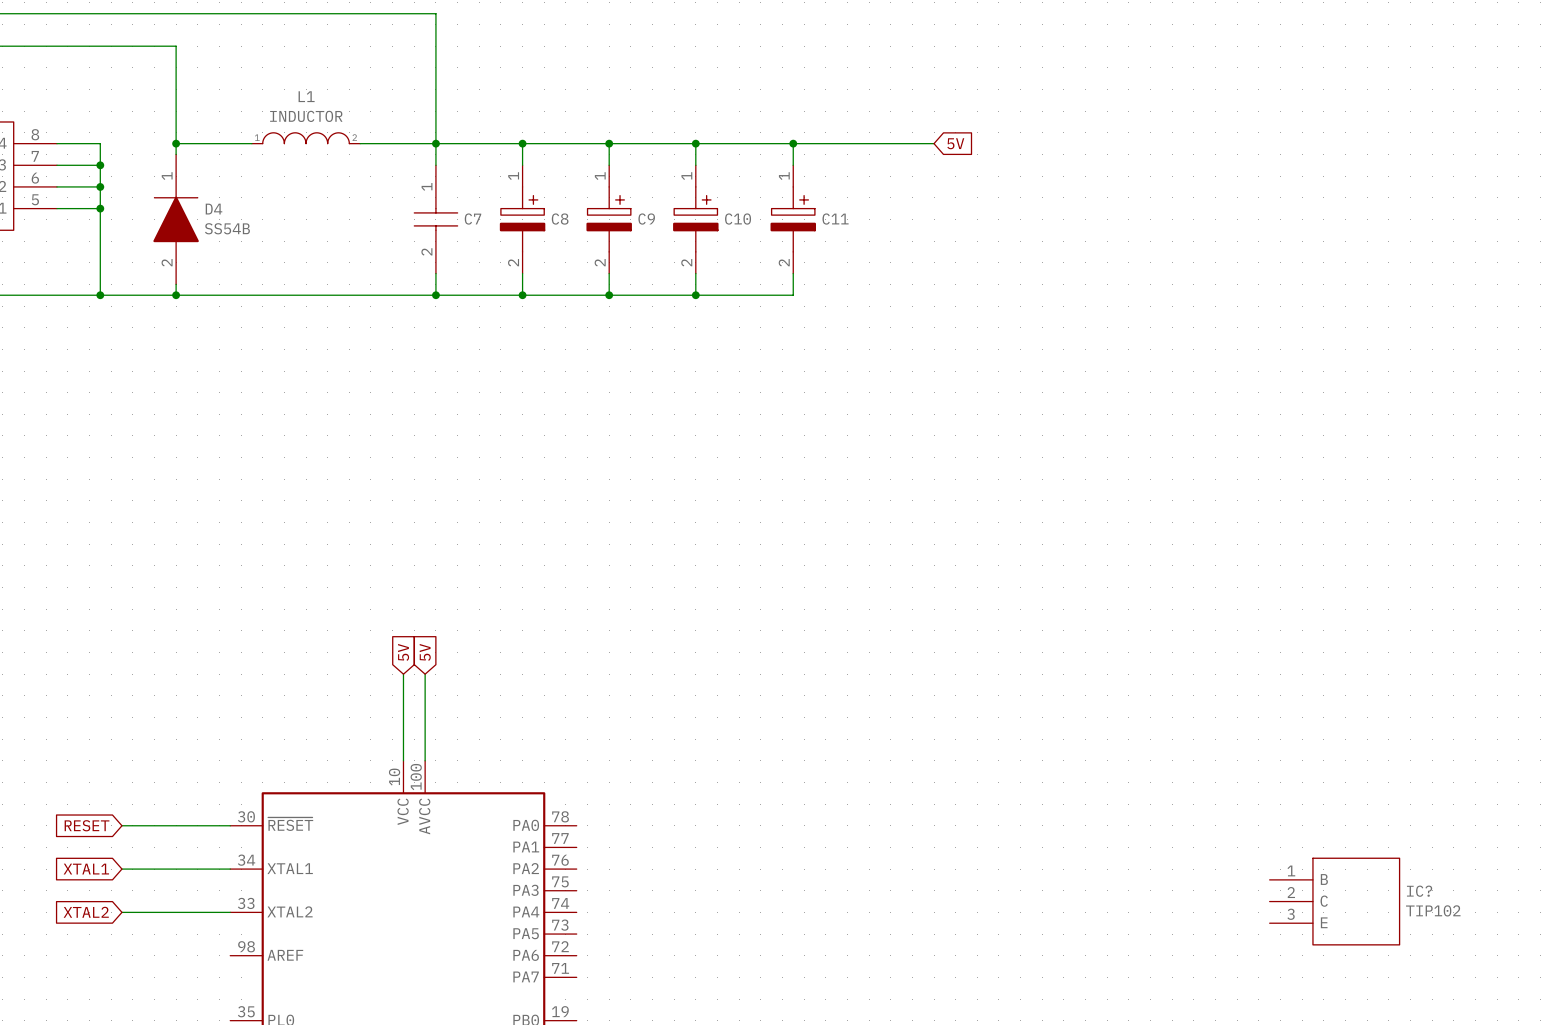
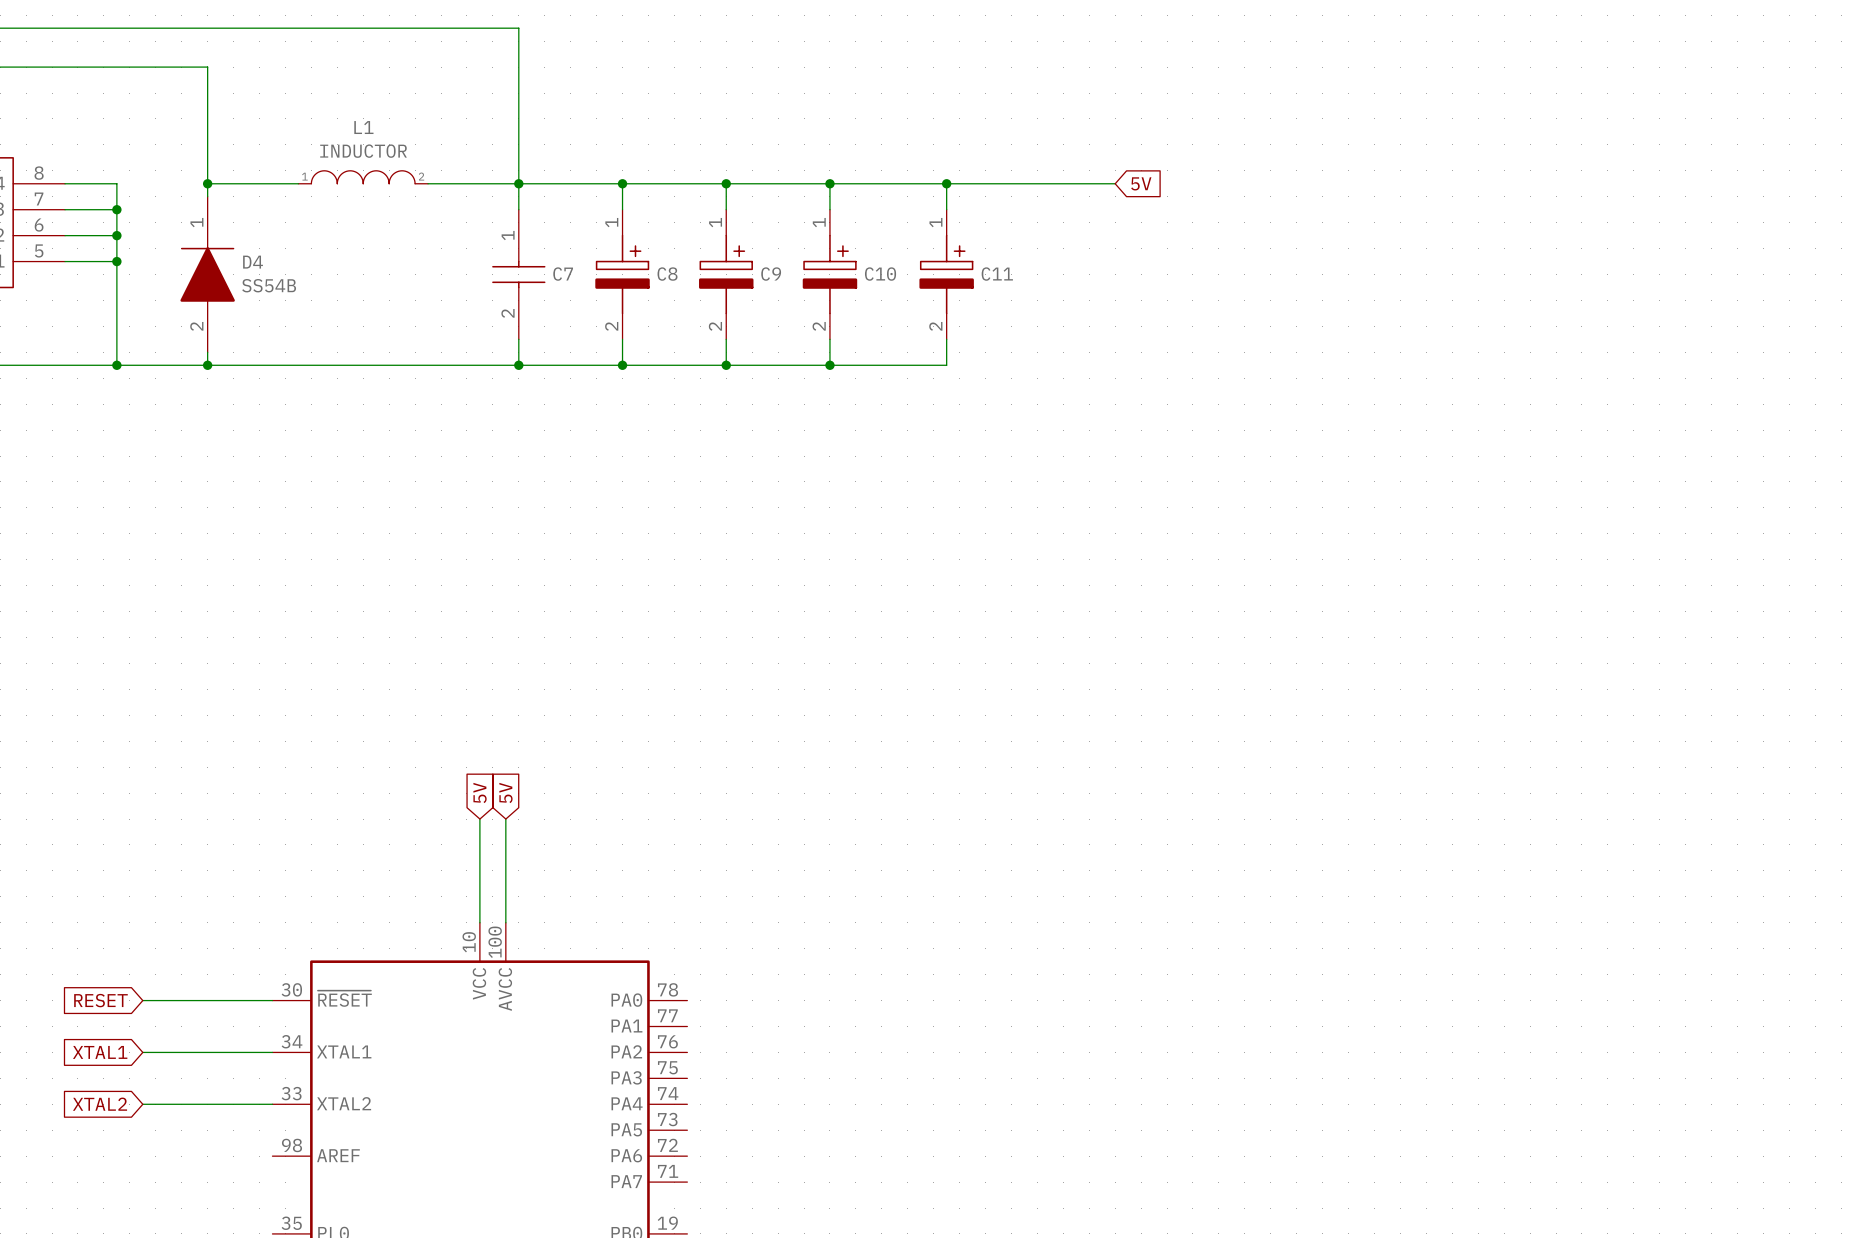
IC?: TIP102 (1334, 901) -> none

